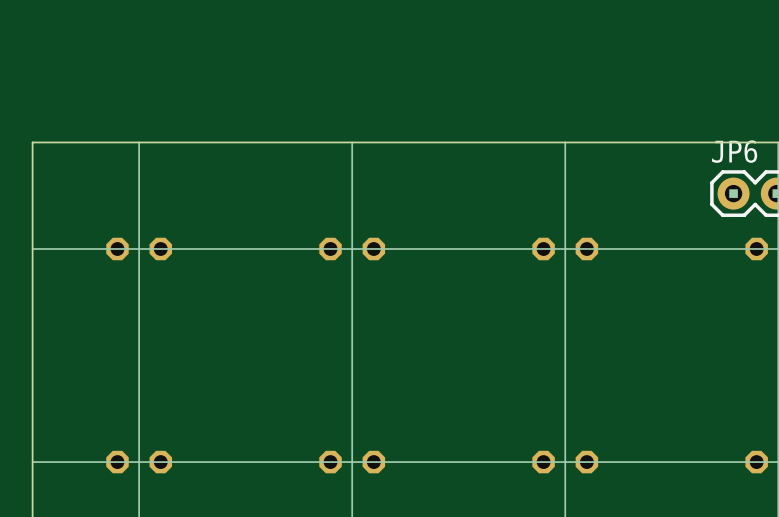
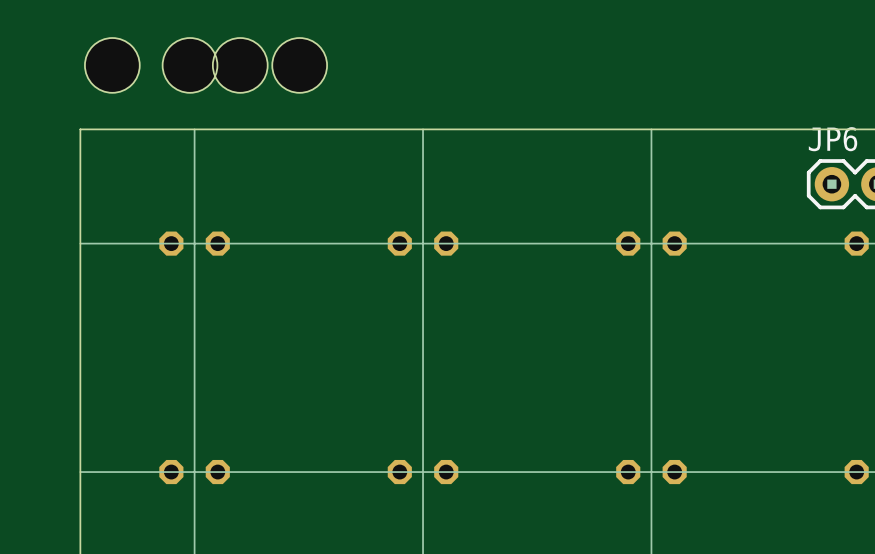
hole: none -> (112, 65)
hole: none -> (190, 65)
hole: none -> (240, 65)
hole: none -> (299, 65)

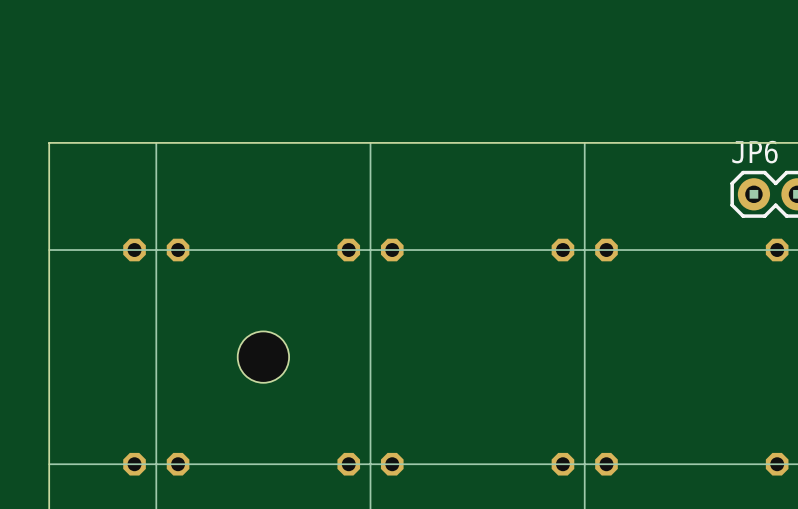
hole: (112, 65) -> none
hole: (190, 65) -> none
hole: (240, 65) -> none
hole: (299, 65) -> none
hole: none -> (263, 357)

